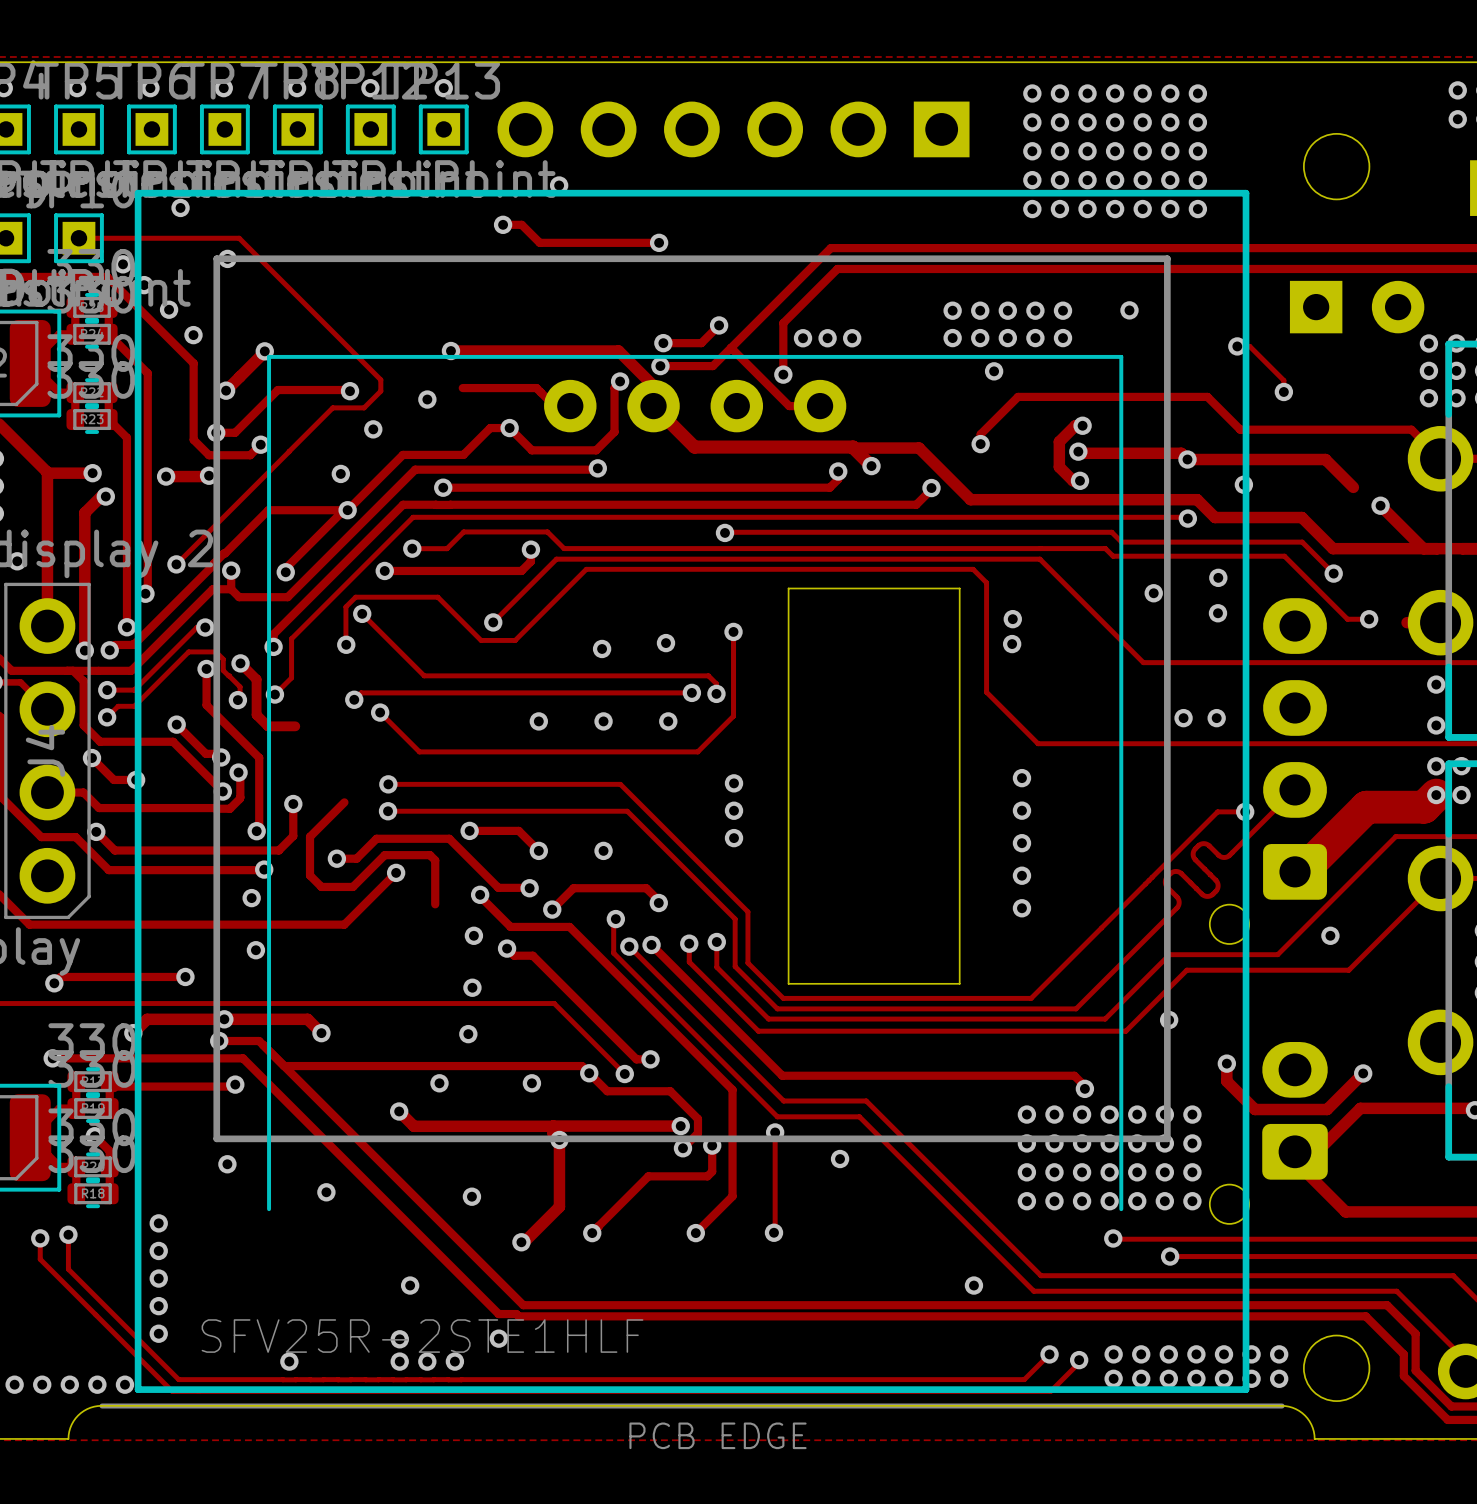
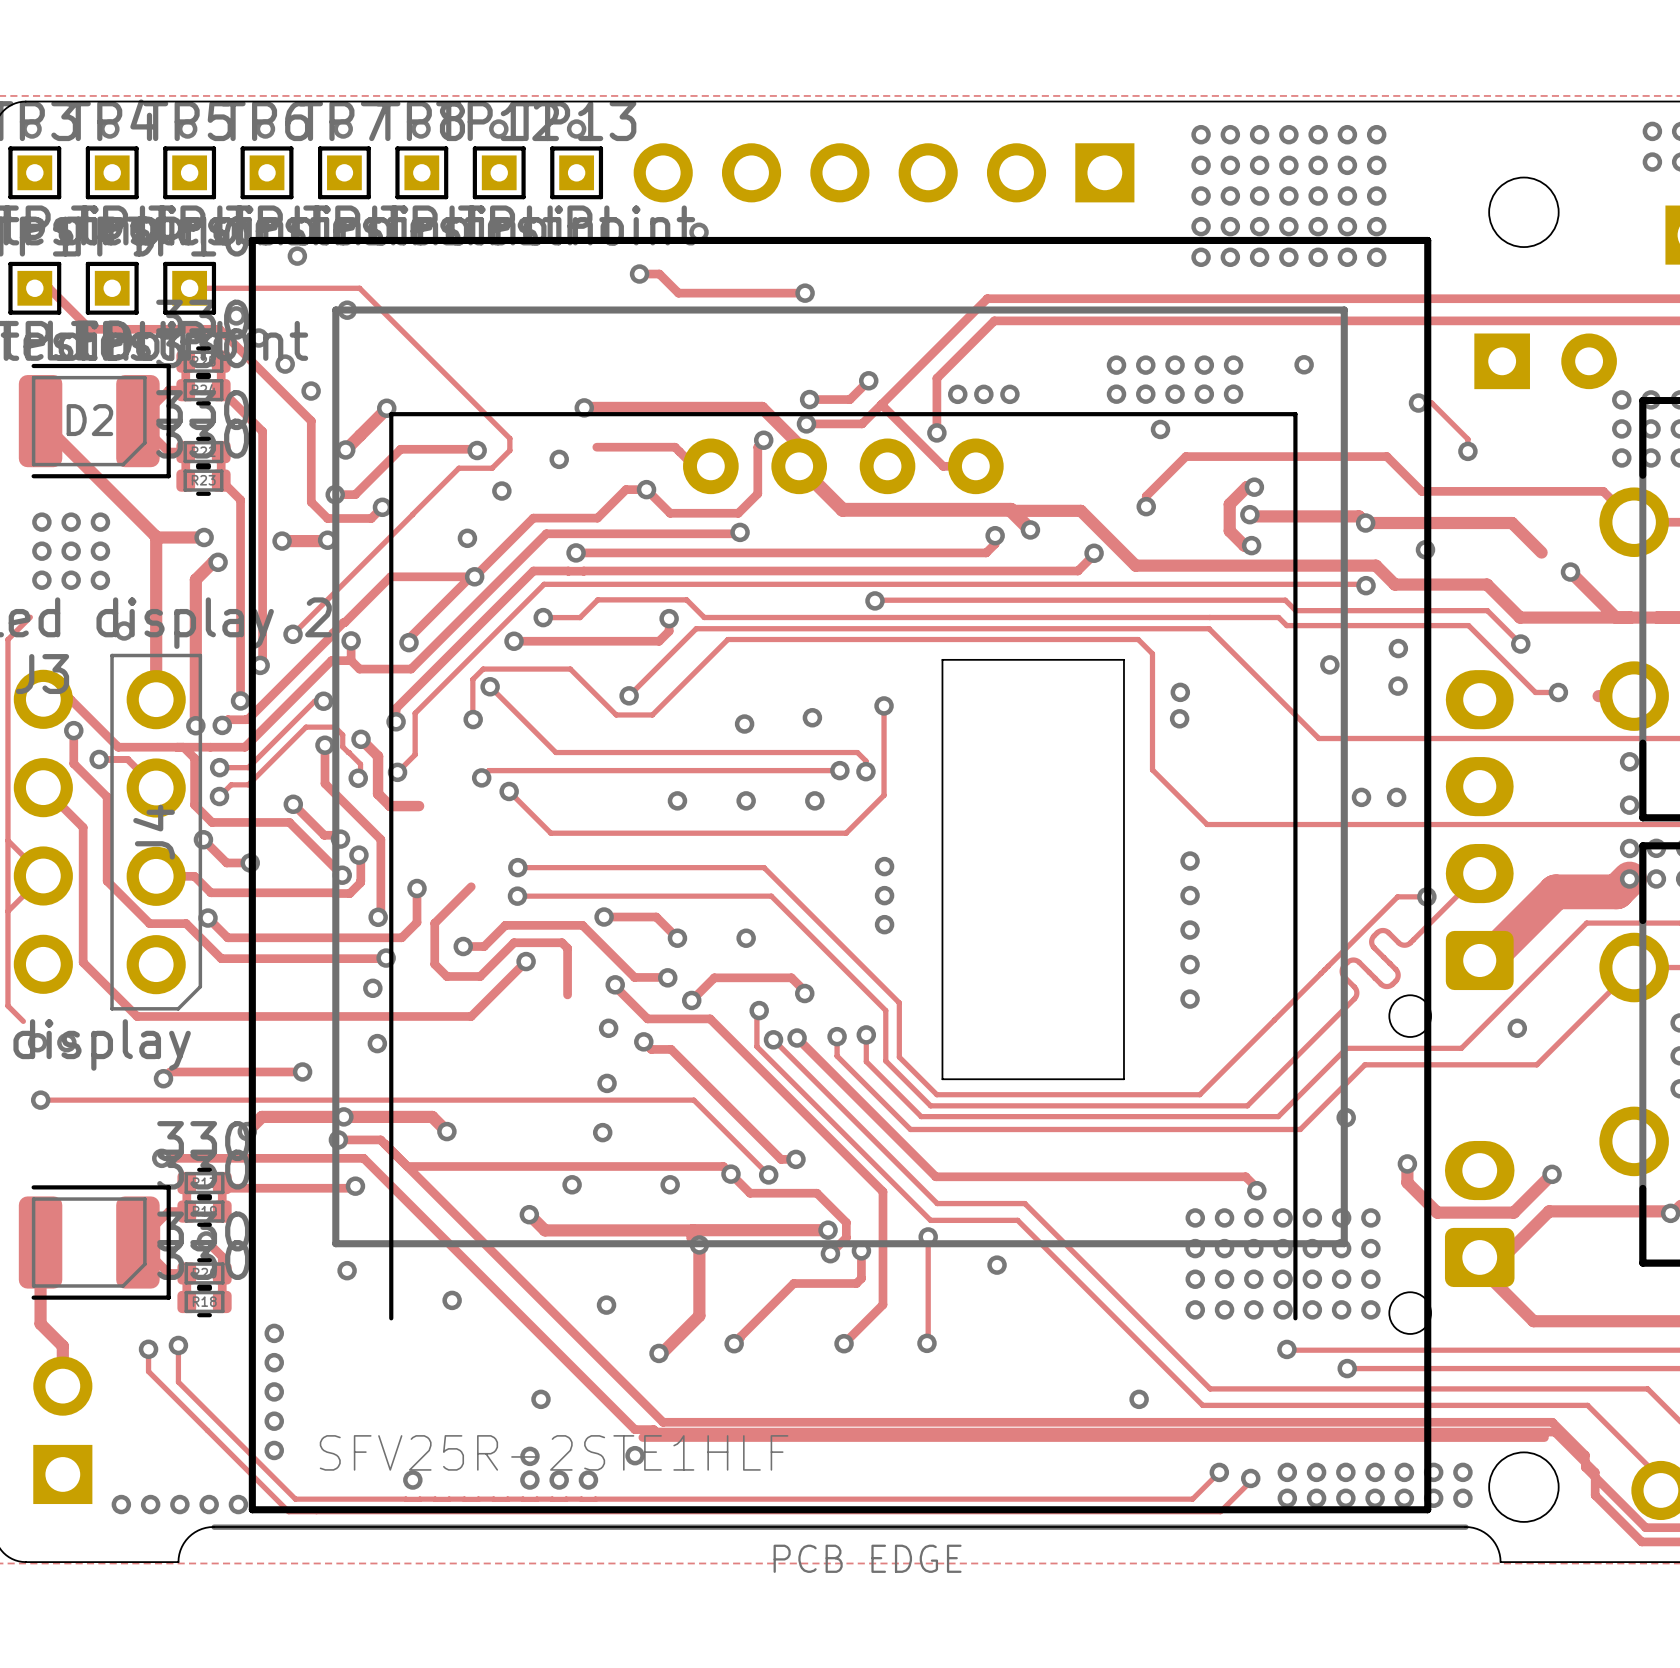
track: (523, 1305) (1387, 1305) (1415, 1333) (1415, 1370) -> (661, 1420) (663, 1422) (1552, 1422) (1585, 1455) (1585, 1467) (1607, 1489)
track: none -> (642, 1437) (1544, 1437)

